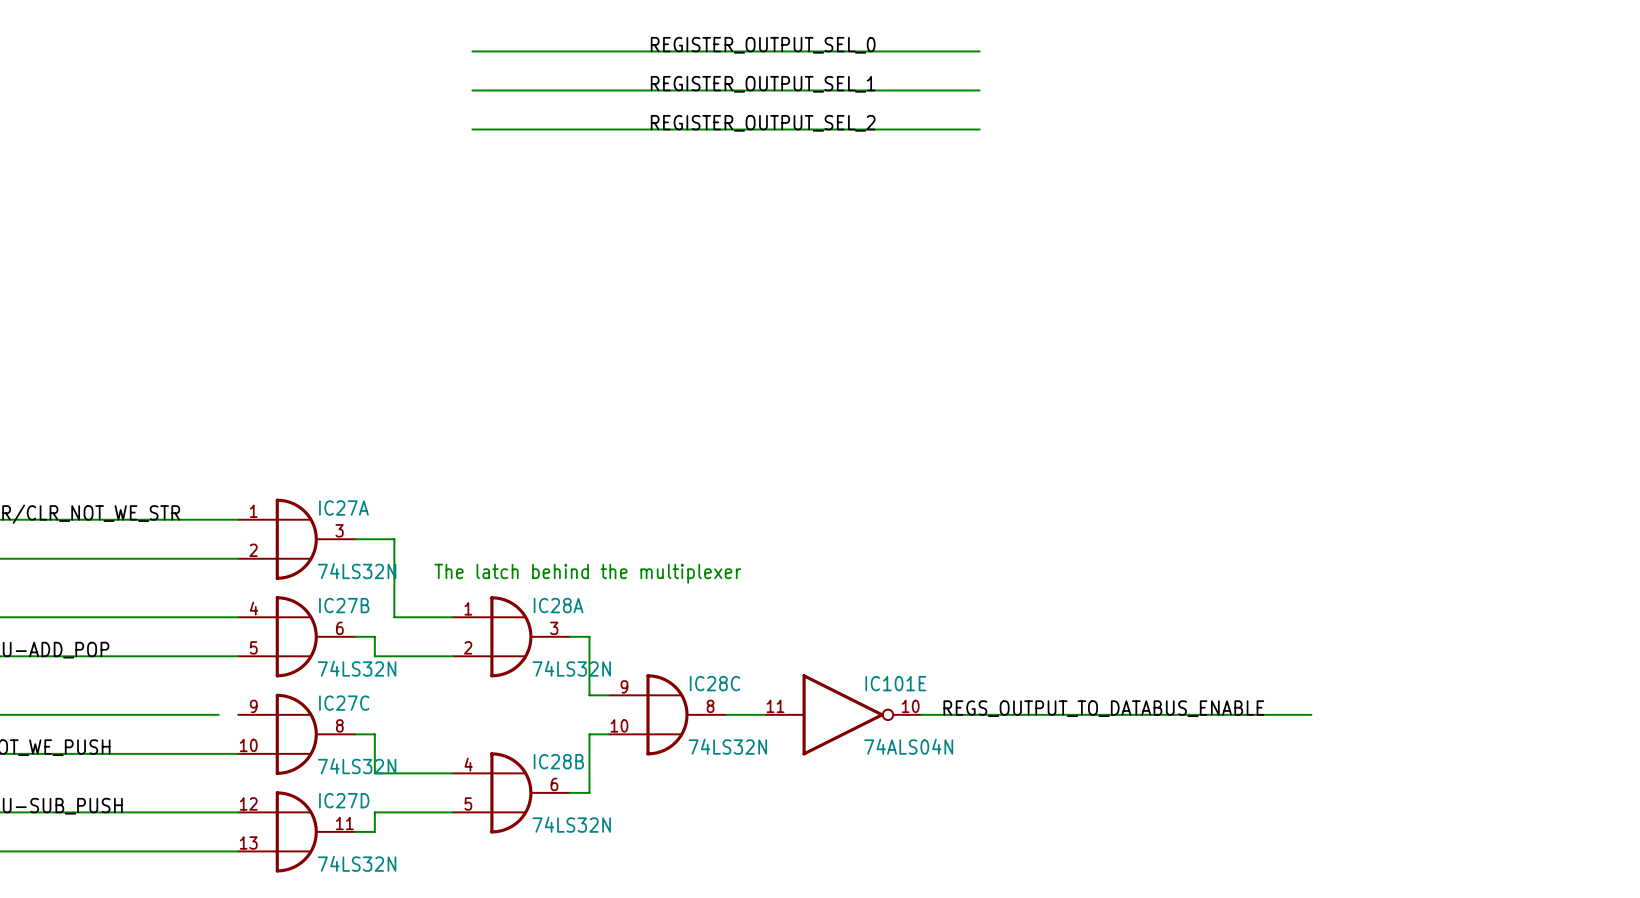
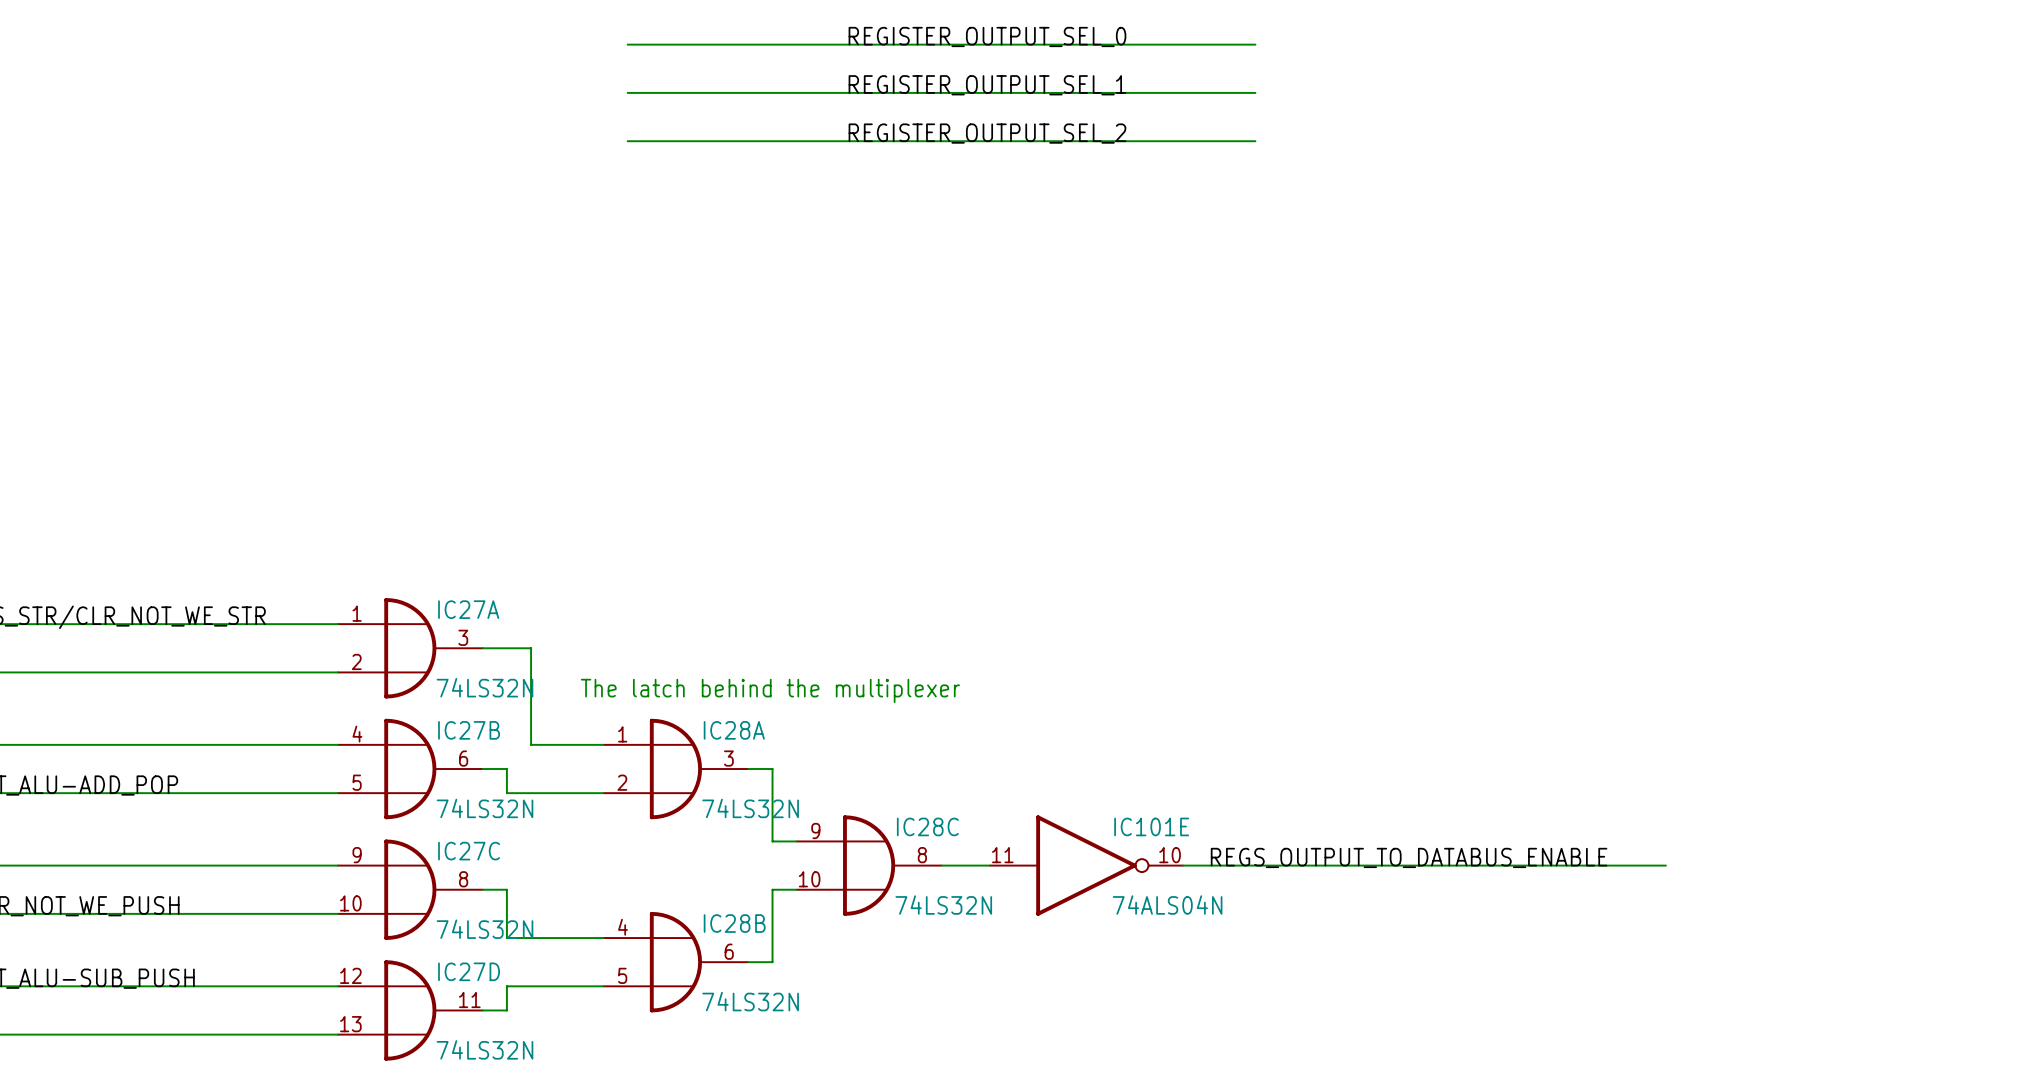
wire: none -> (313, 865) (337, 865)

